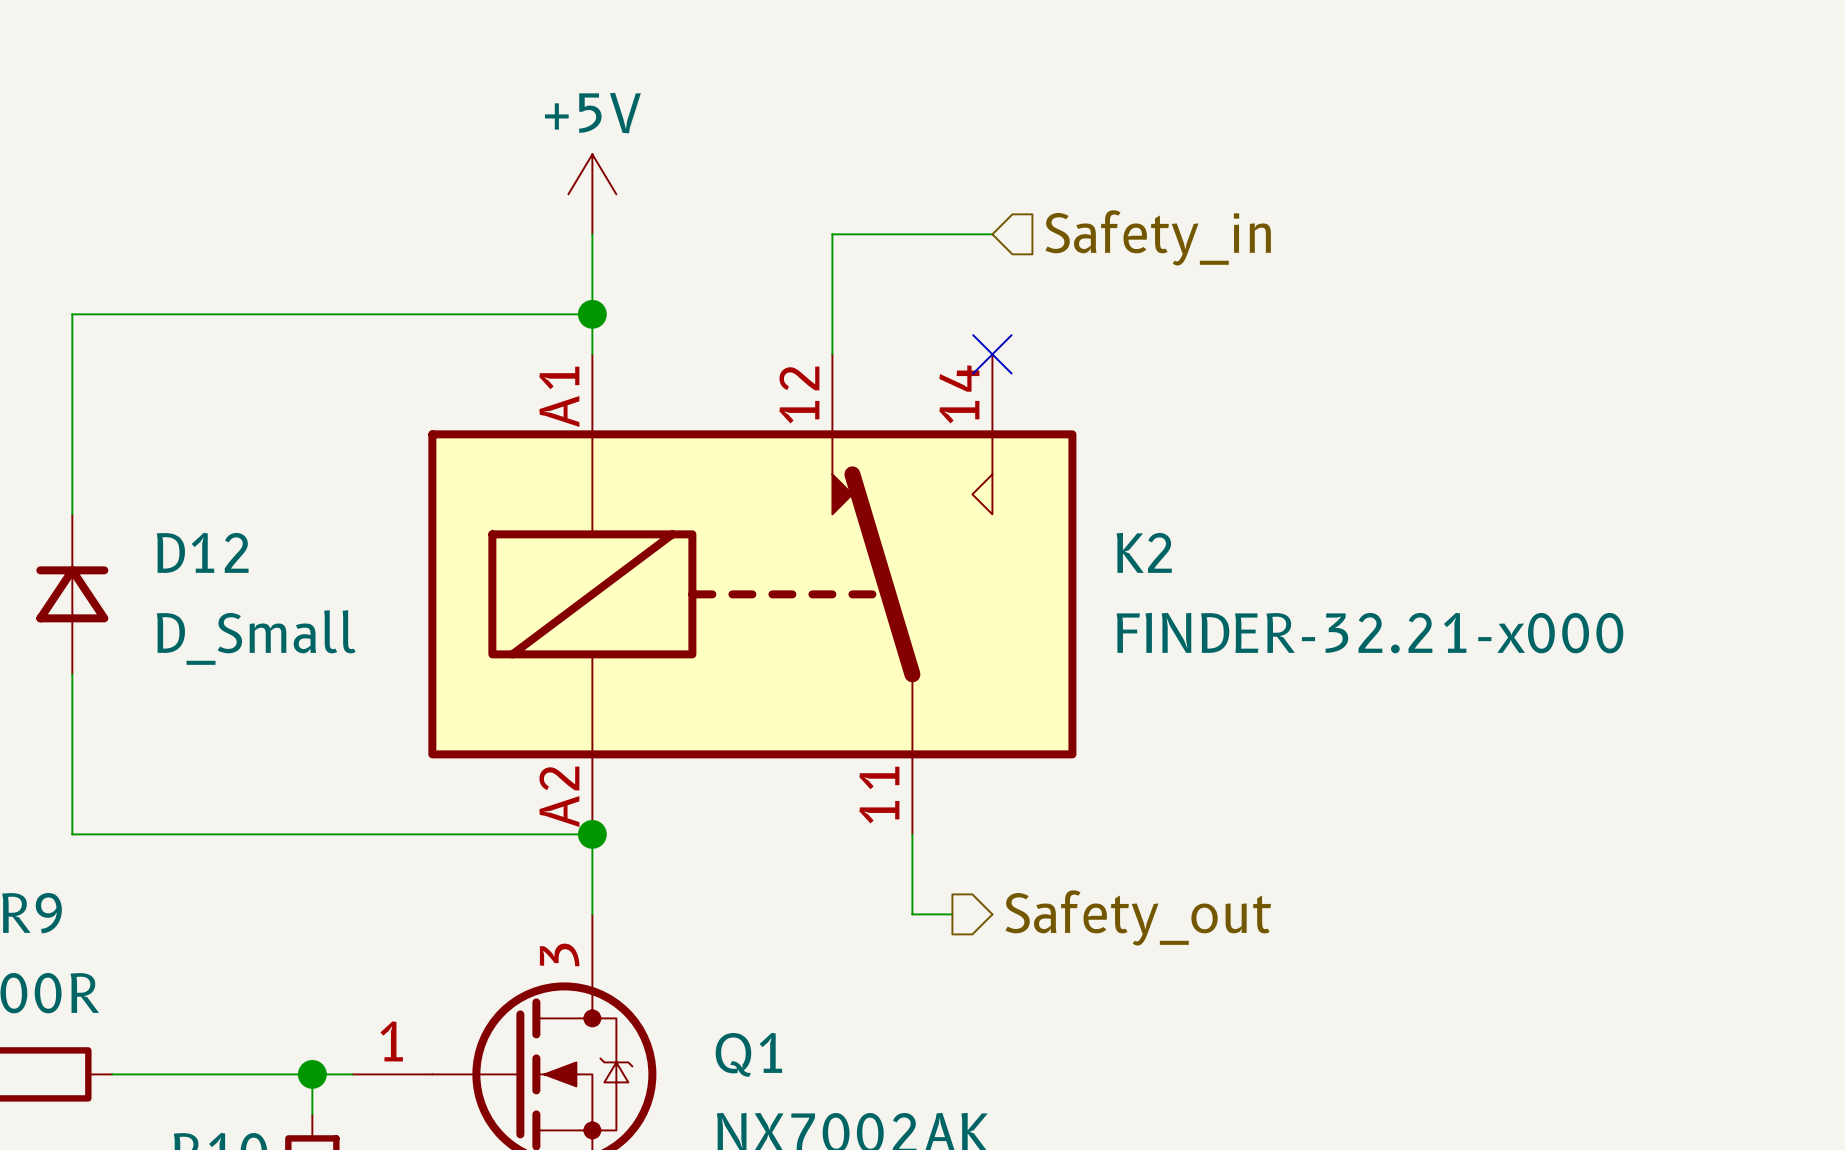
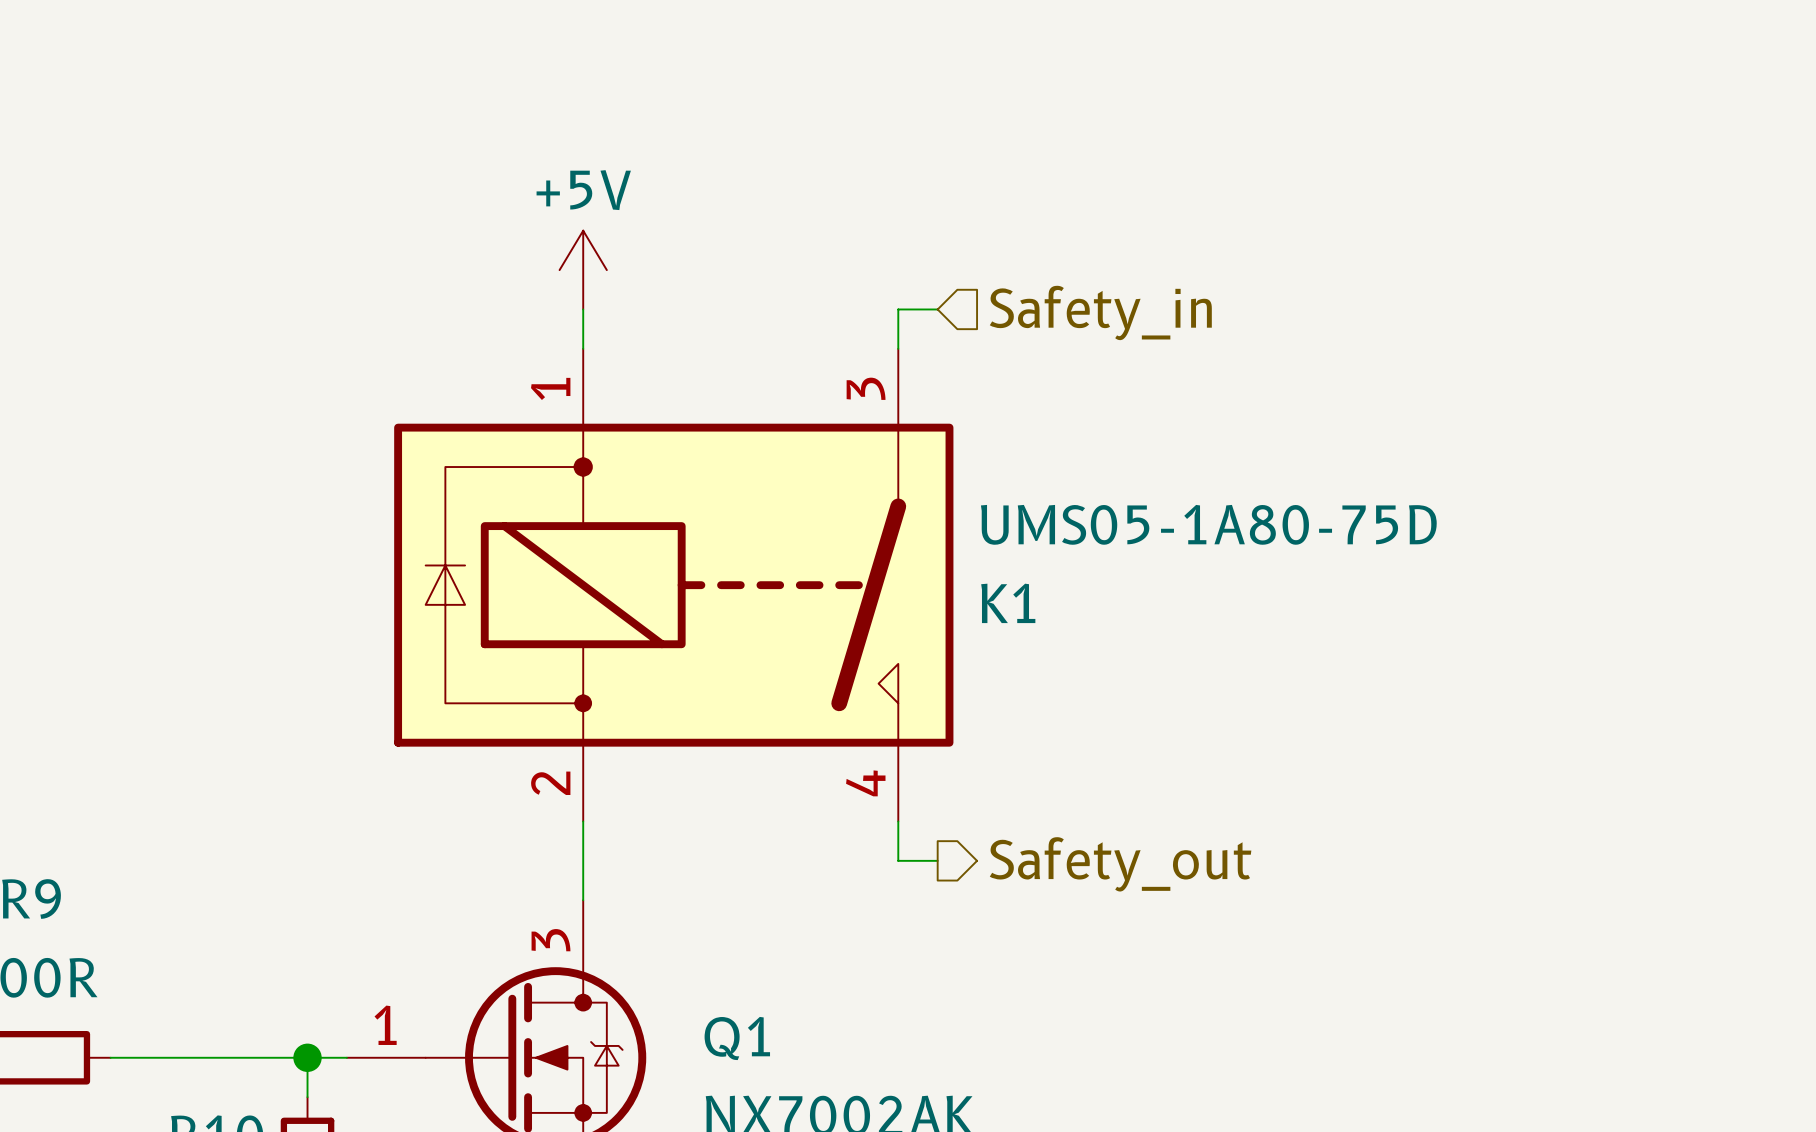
power symbol position: +5V (592, 194) -> +5V (583, 270)
wire: (592, 234) (592, 314) (72, 314) (72, 514) -> none
wire: (992, 234) (832, 234) (832, 354) -> none
hierarchical label position: Safety_in (1158, 237) -> Safety_in (1100, 312)
junction: (592, 314) -> none
wire: none -> (937, 309) (898, 309) (898, 348)
no-connect mark: (992, 354) -> none
D12: D_Small (72, 594) -> none
K1: none -> UMS05-1A80-75D (673, 585)
K2: FINDER-32.21-x000 (752, 594) -> none
wire: (72, 674) (72, 834) (592, 834) -> none
junction: (592, 834) -> none
wire: (912, 874) (912, 914) (952, 914) -> (898, 860) (937, 860)
hierarchical label position: Safety_out (1138, 917) -> Safety_out (1120, 864)

